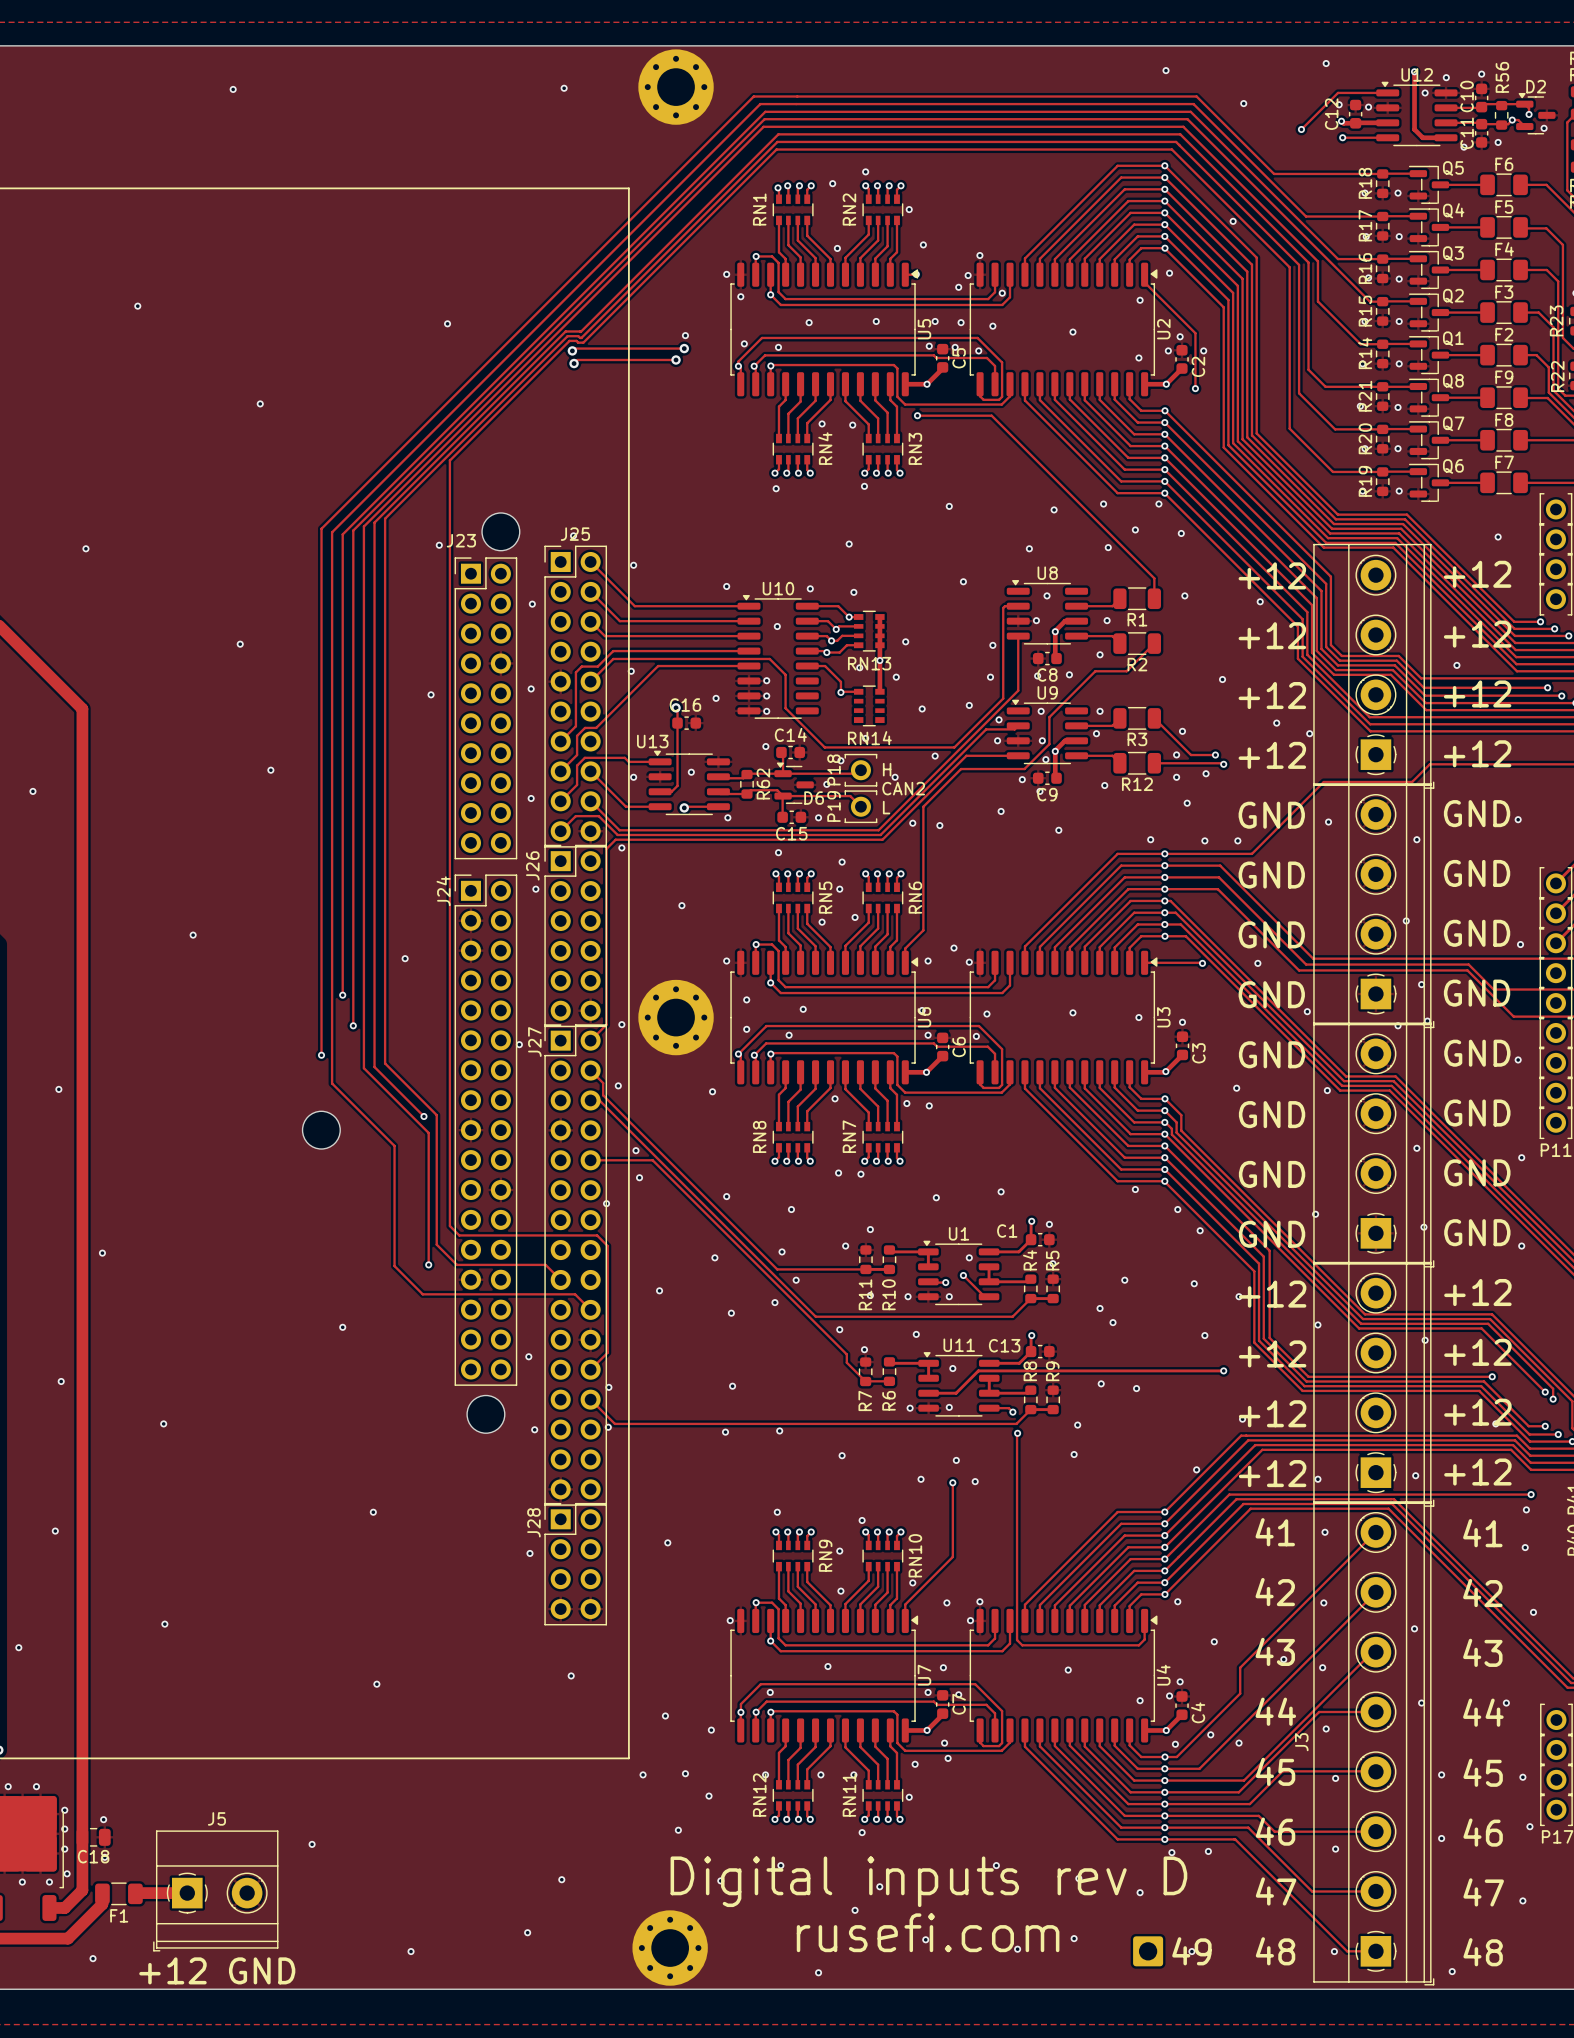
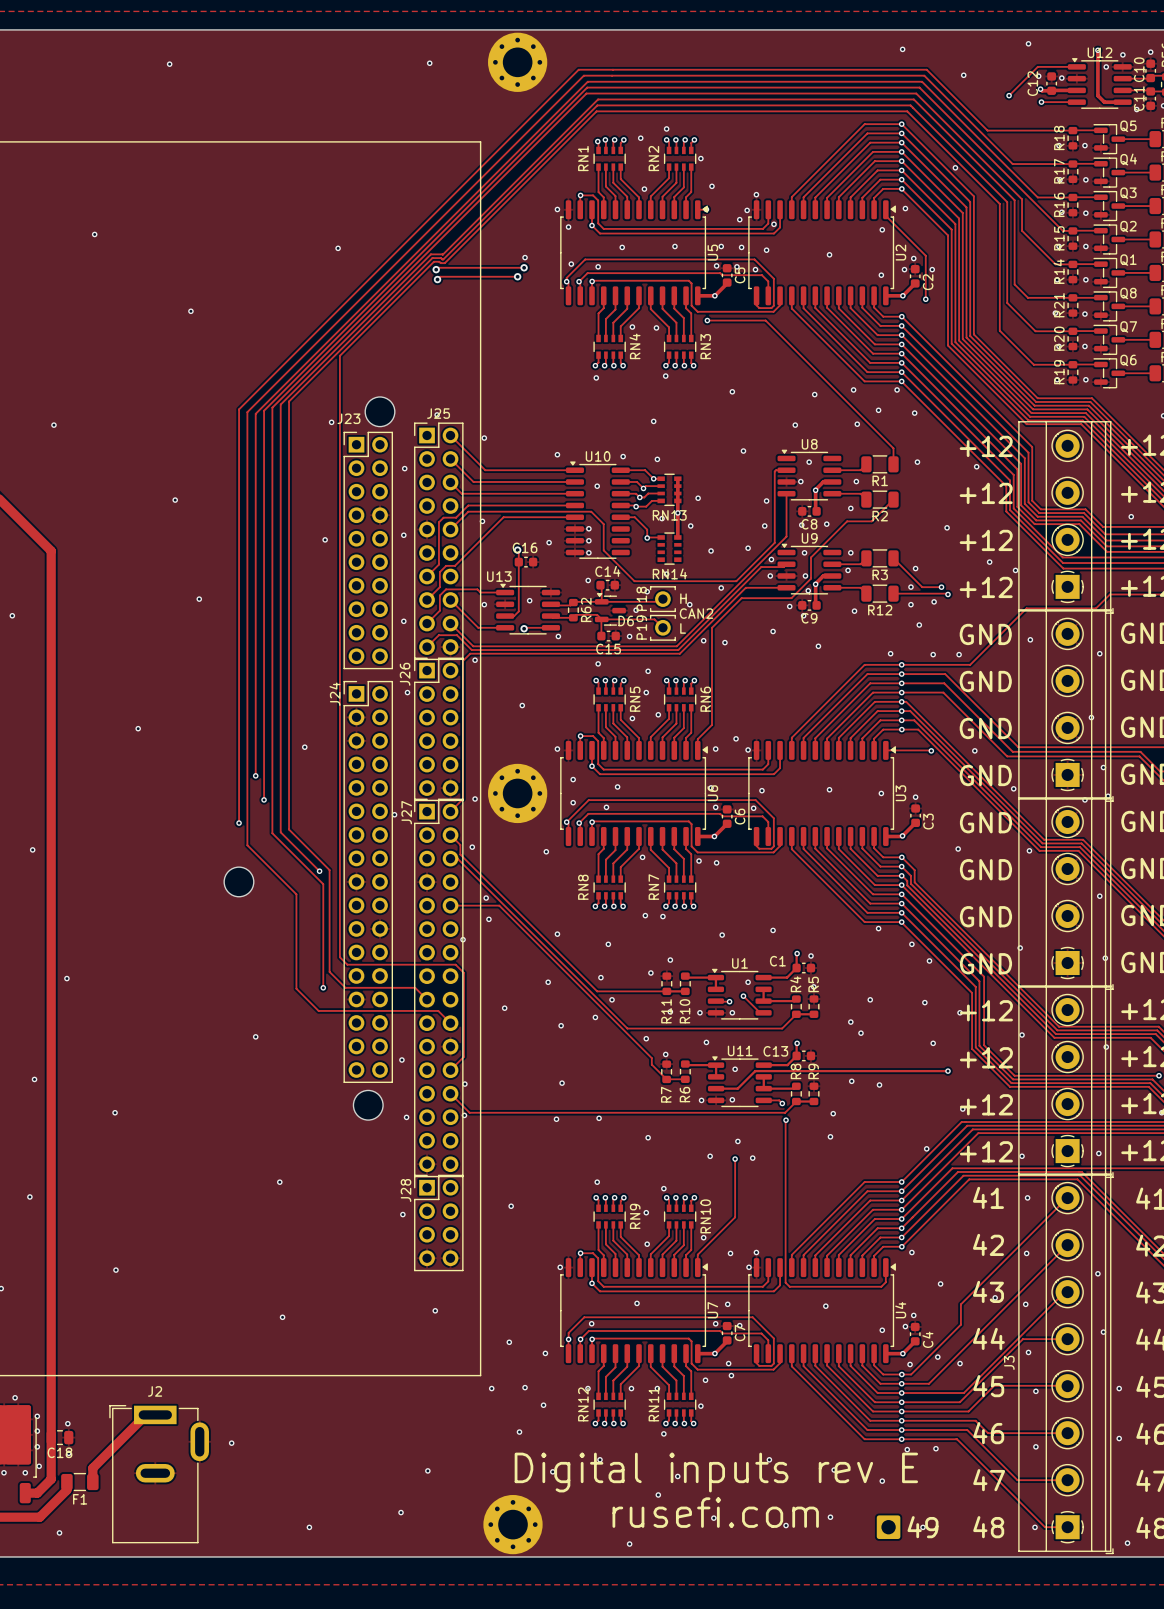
text: Digital inputs rev D (928, 1881) -> Digital inputs rev E (716, 1472)
J2: none -> (159, 1474)
J5: (215, 1890) -> none
track: (187, 1893) (135, 1893) -> (155, 1414) (146, 1414) (92, 1468) (92, 1482)
text: +12 (172, 1970) -> none
text: GND (262, 1970) -> none

